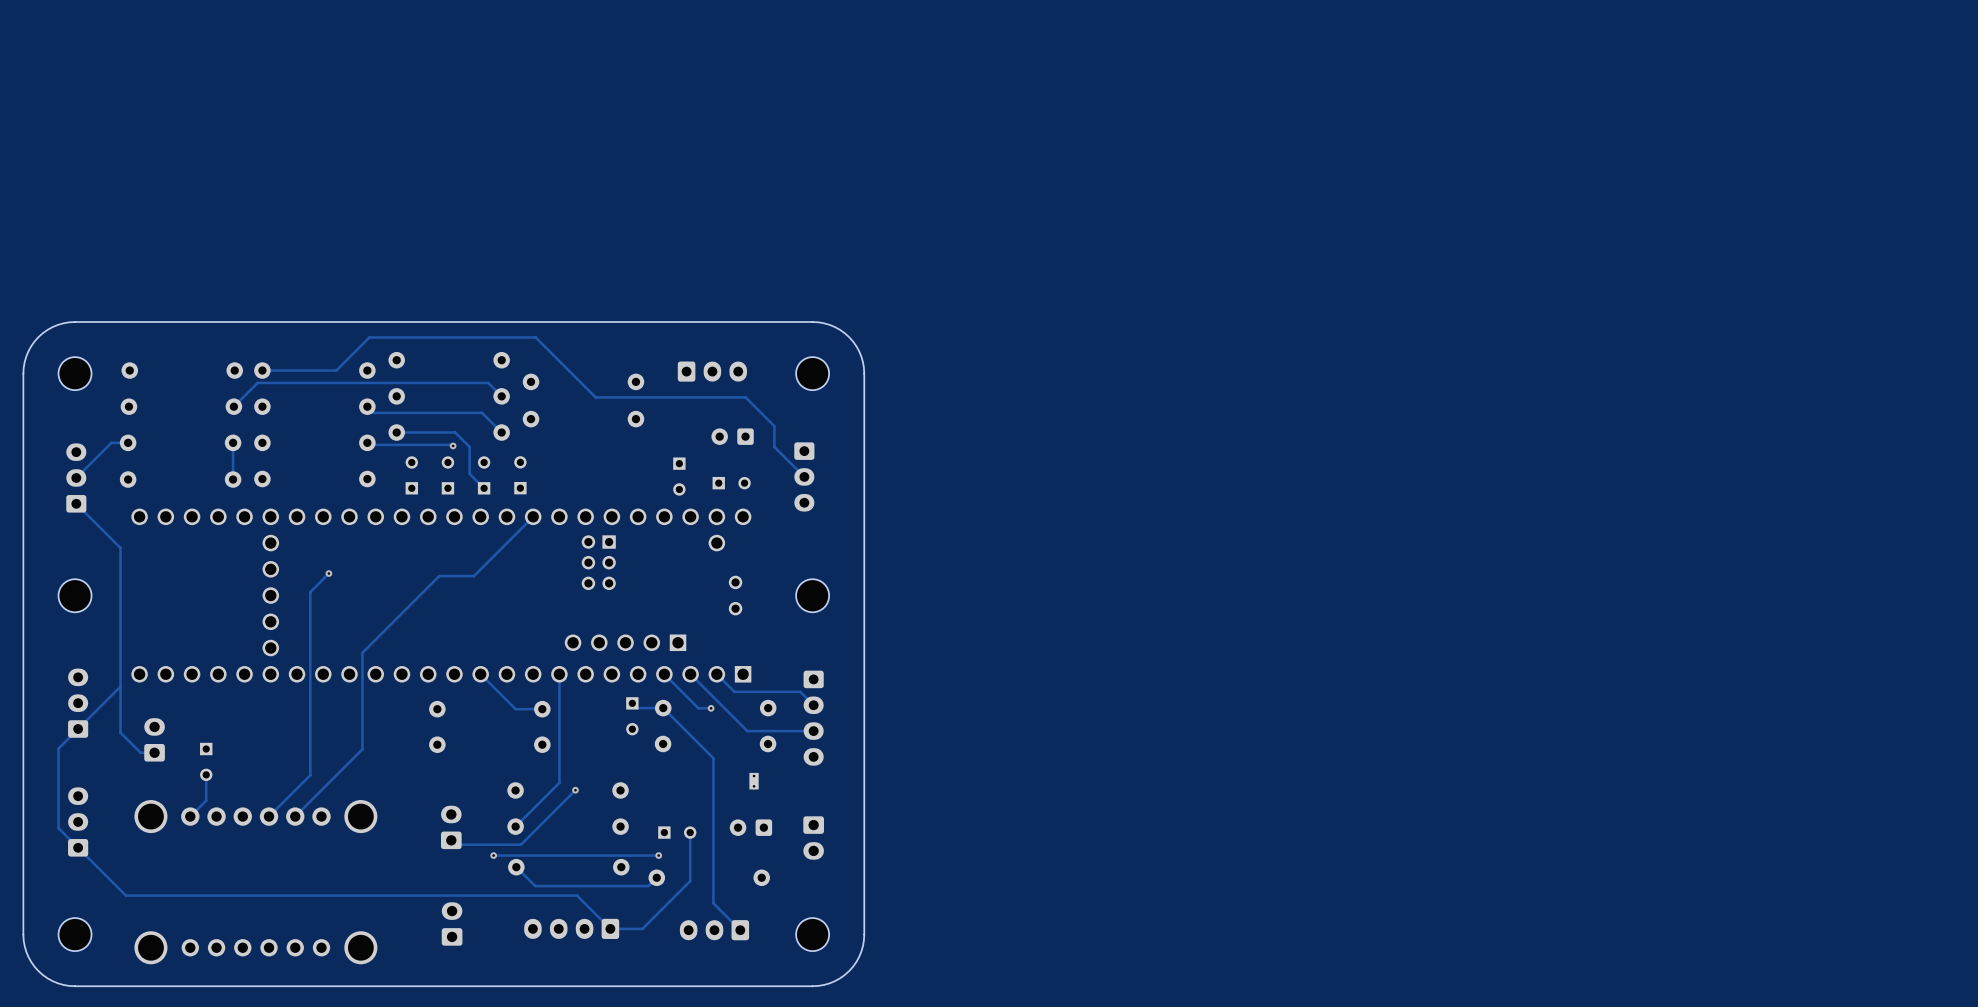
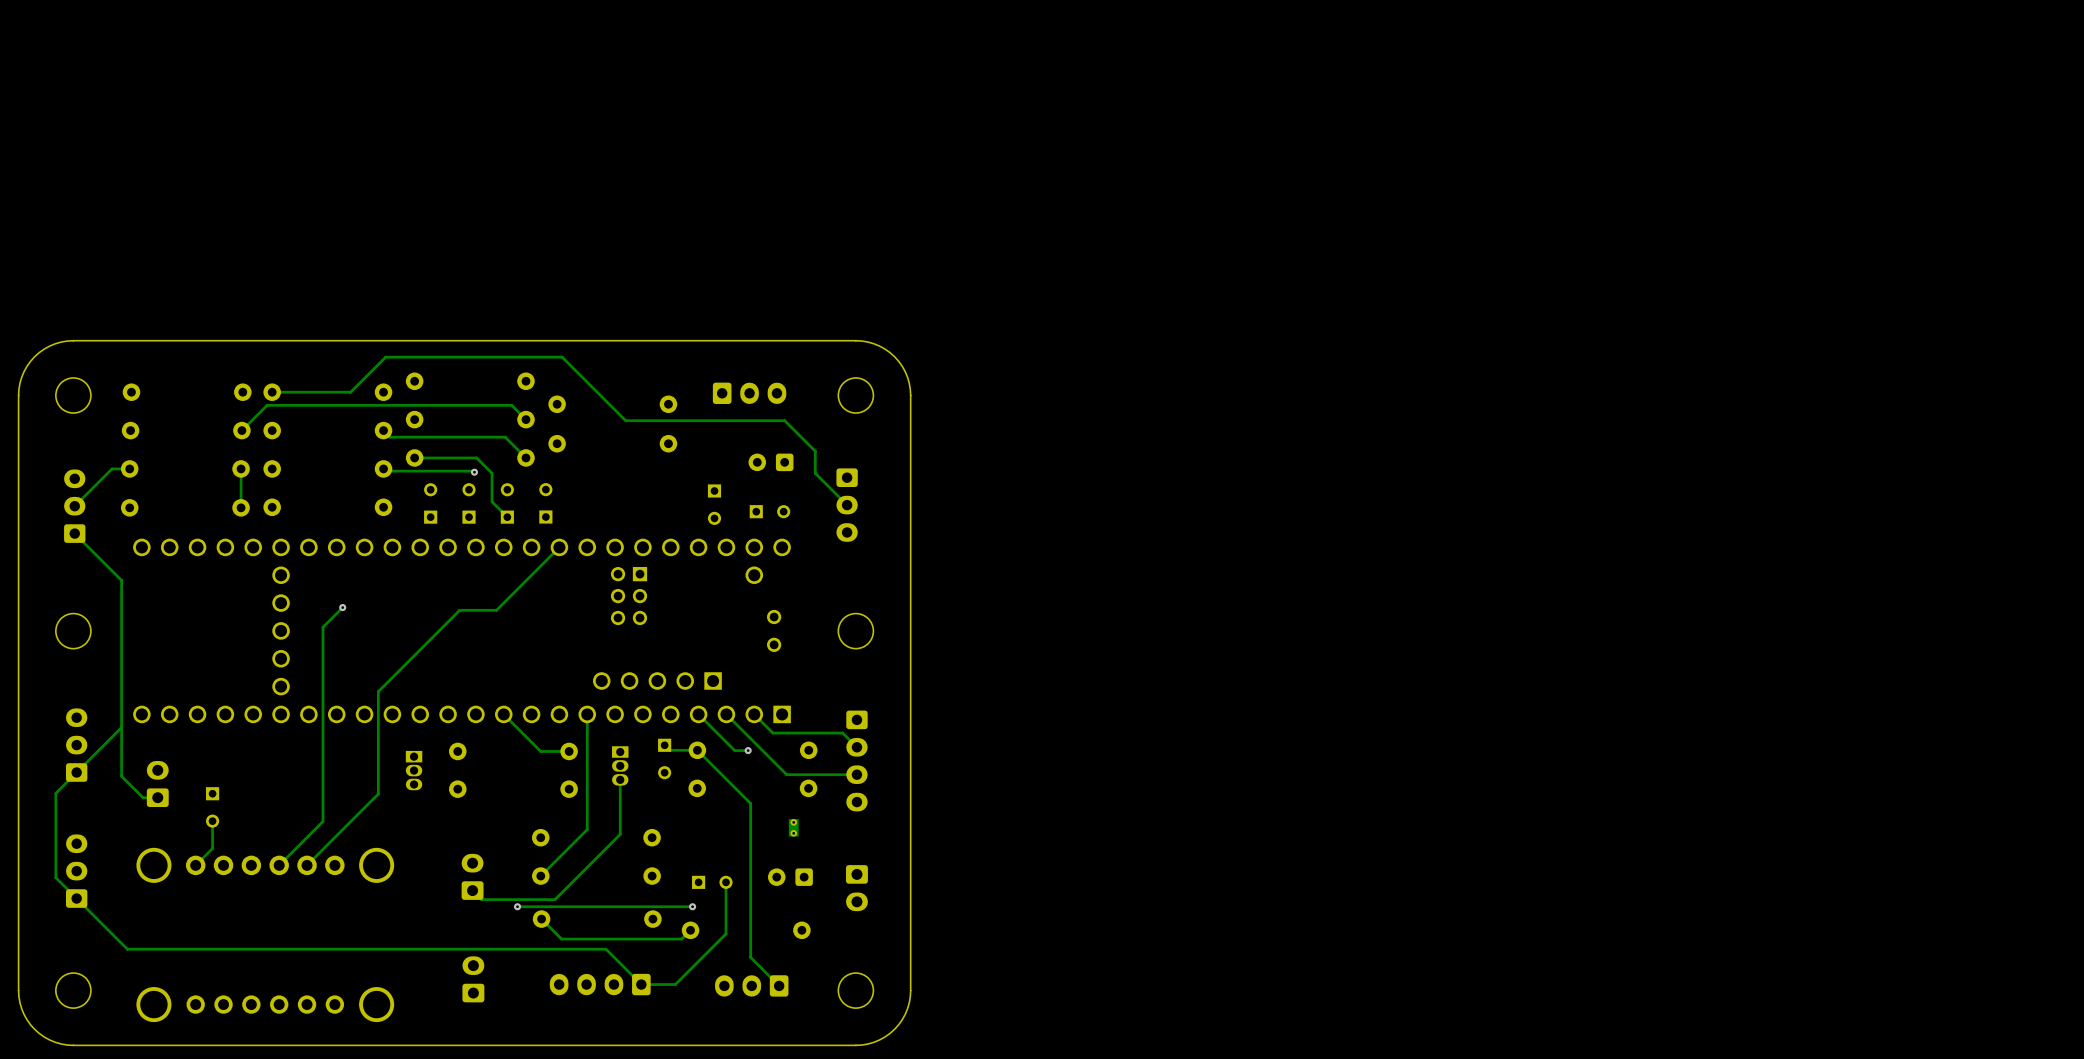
part: none -> (620, 765)
part: none -> (414, 770)
track: (575, 790) (520, 844) (455, 844) -> (620, 779) (620, 834) (555, 899) (481, 899) (477, 895)
via: (575, 790) -> none

